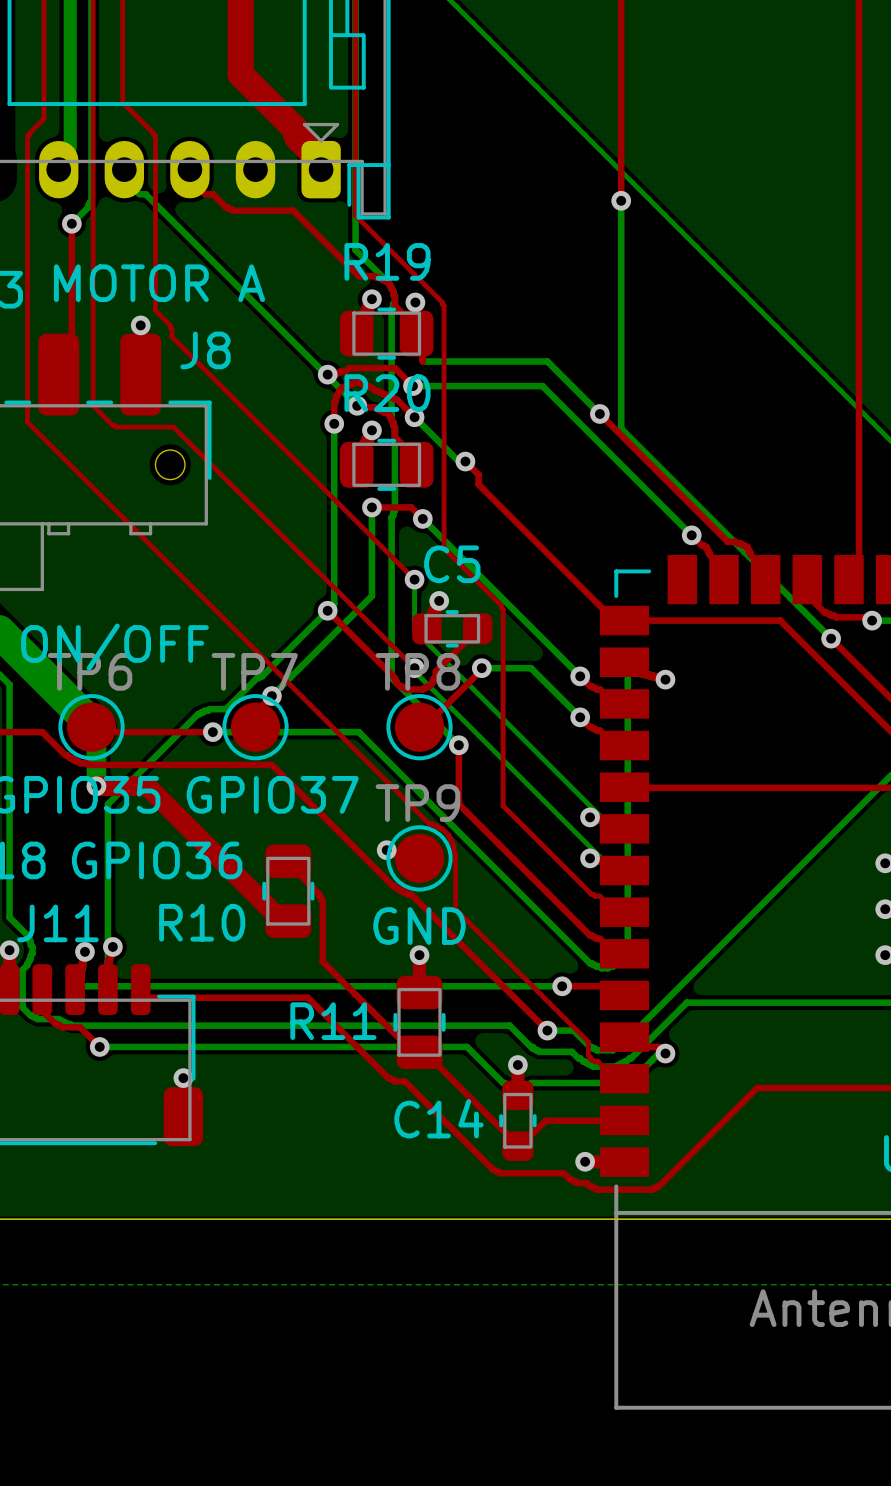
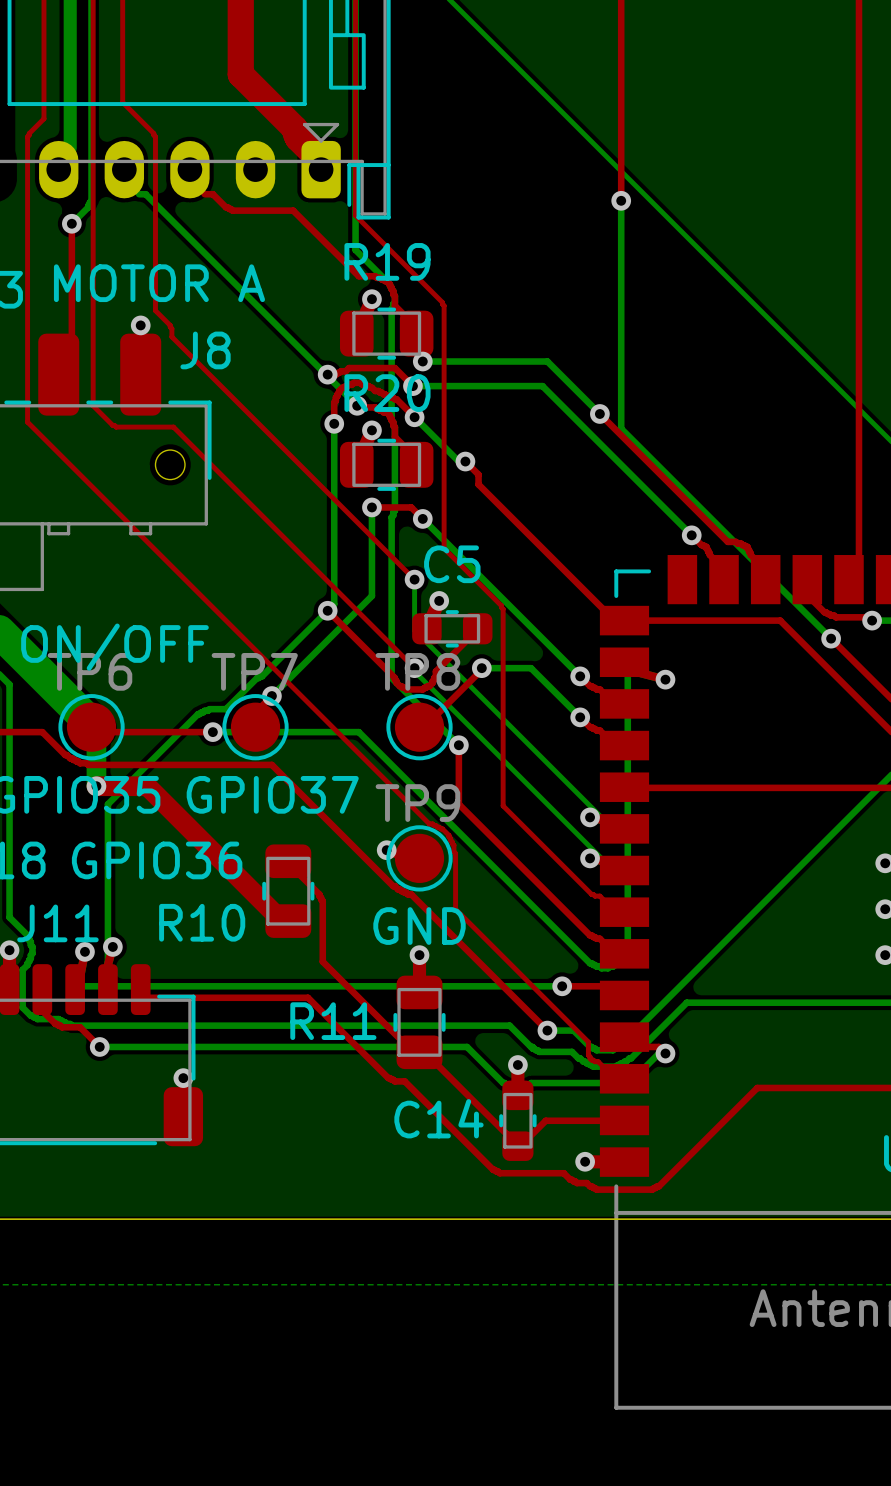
via position: (415, 302) -> (422, 361)

